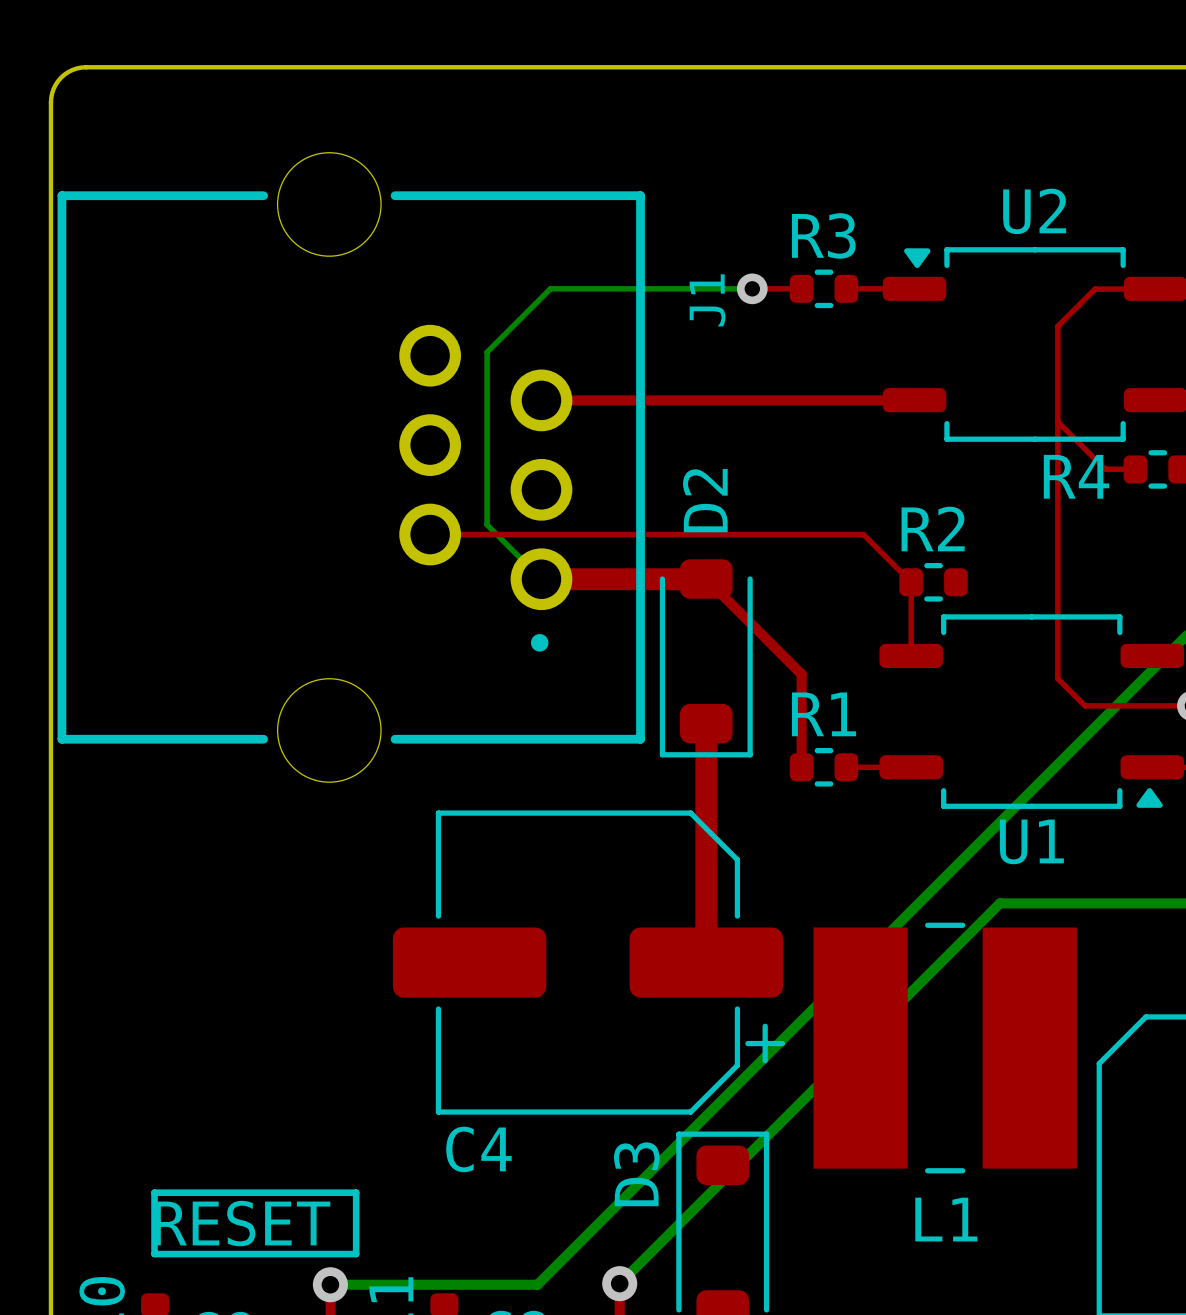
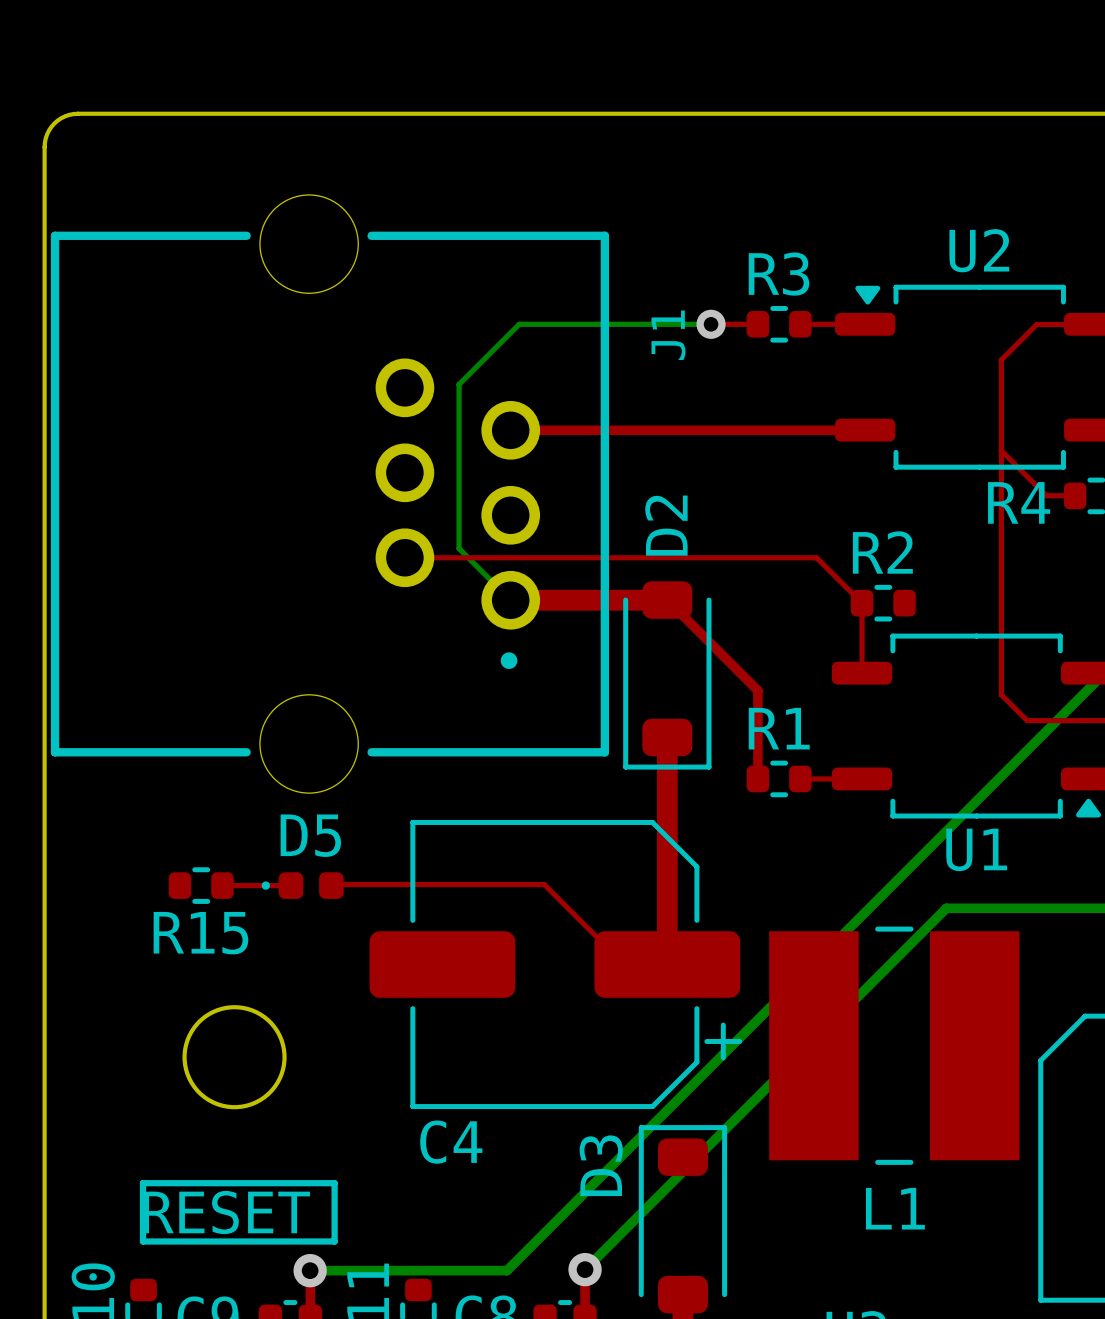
R15: none -> (201, 885)
top track: none -> (222, 885) (290, 885)
D5: none -> (302, 885)
top track: none -> (331, 885) (544, 884) (624, 964) (667, 964)
round board edge: none -> [182, 1005, 287, 1110]

